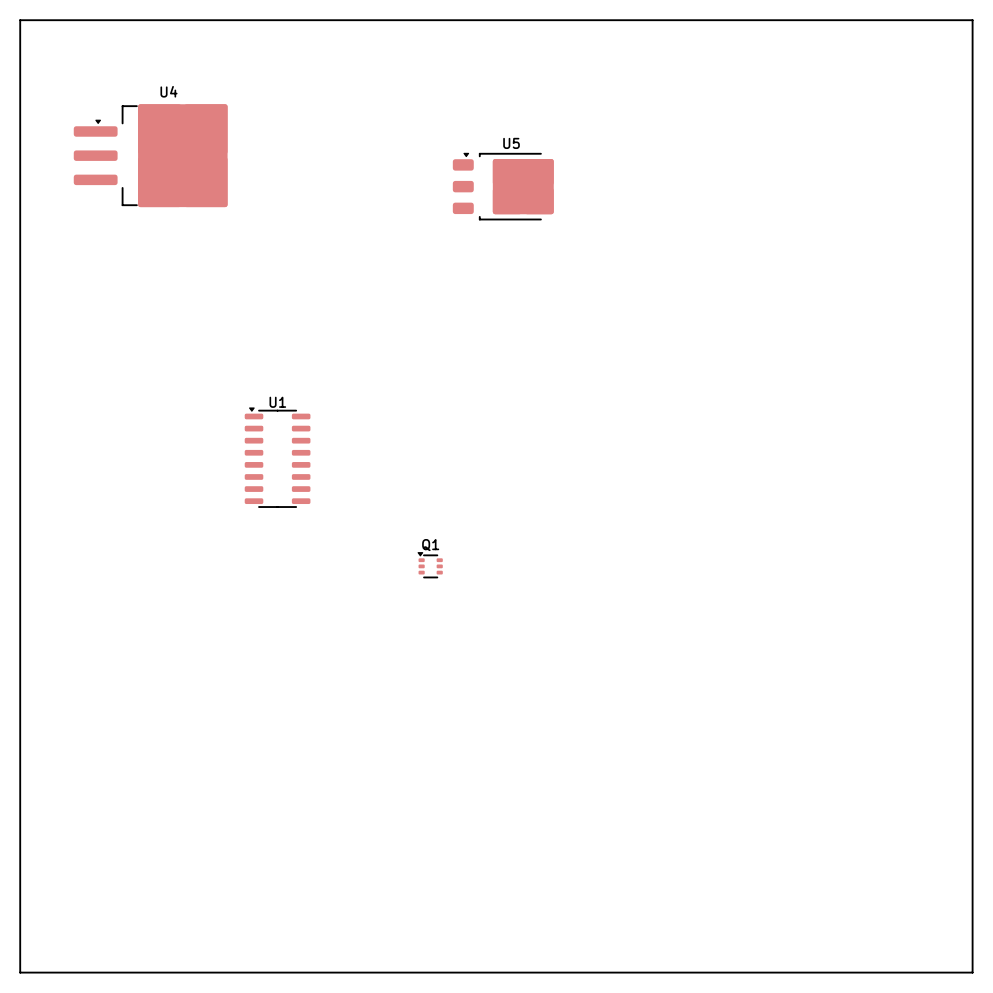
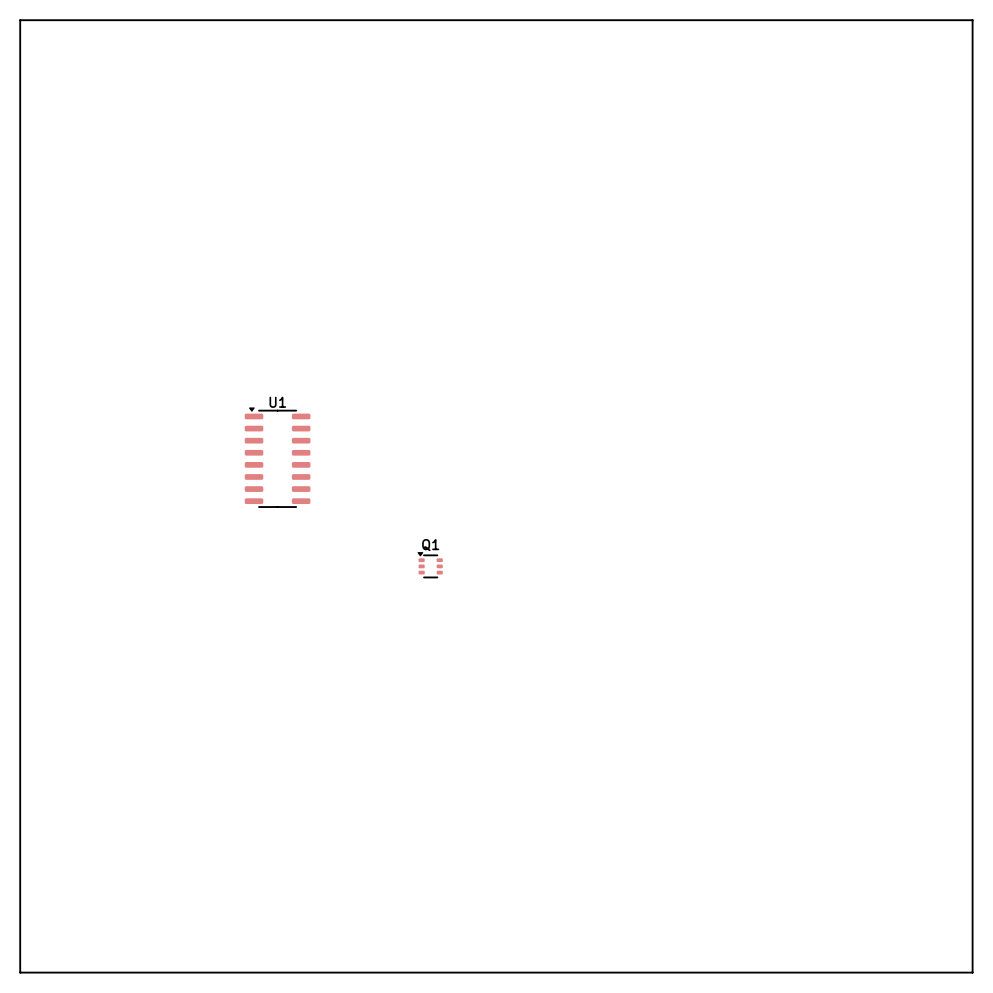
U4: (150, 155) -> none
U5: (503, 186) -> none

